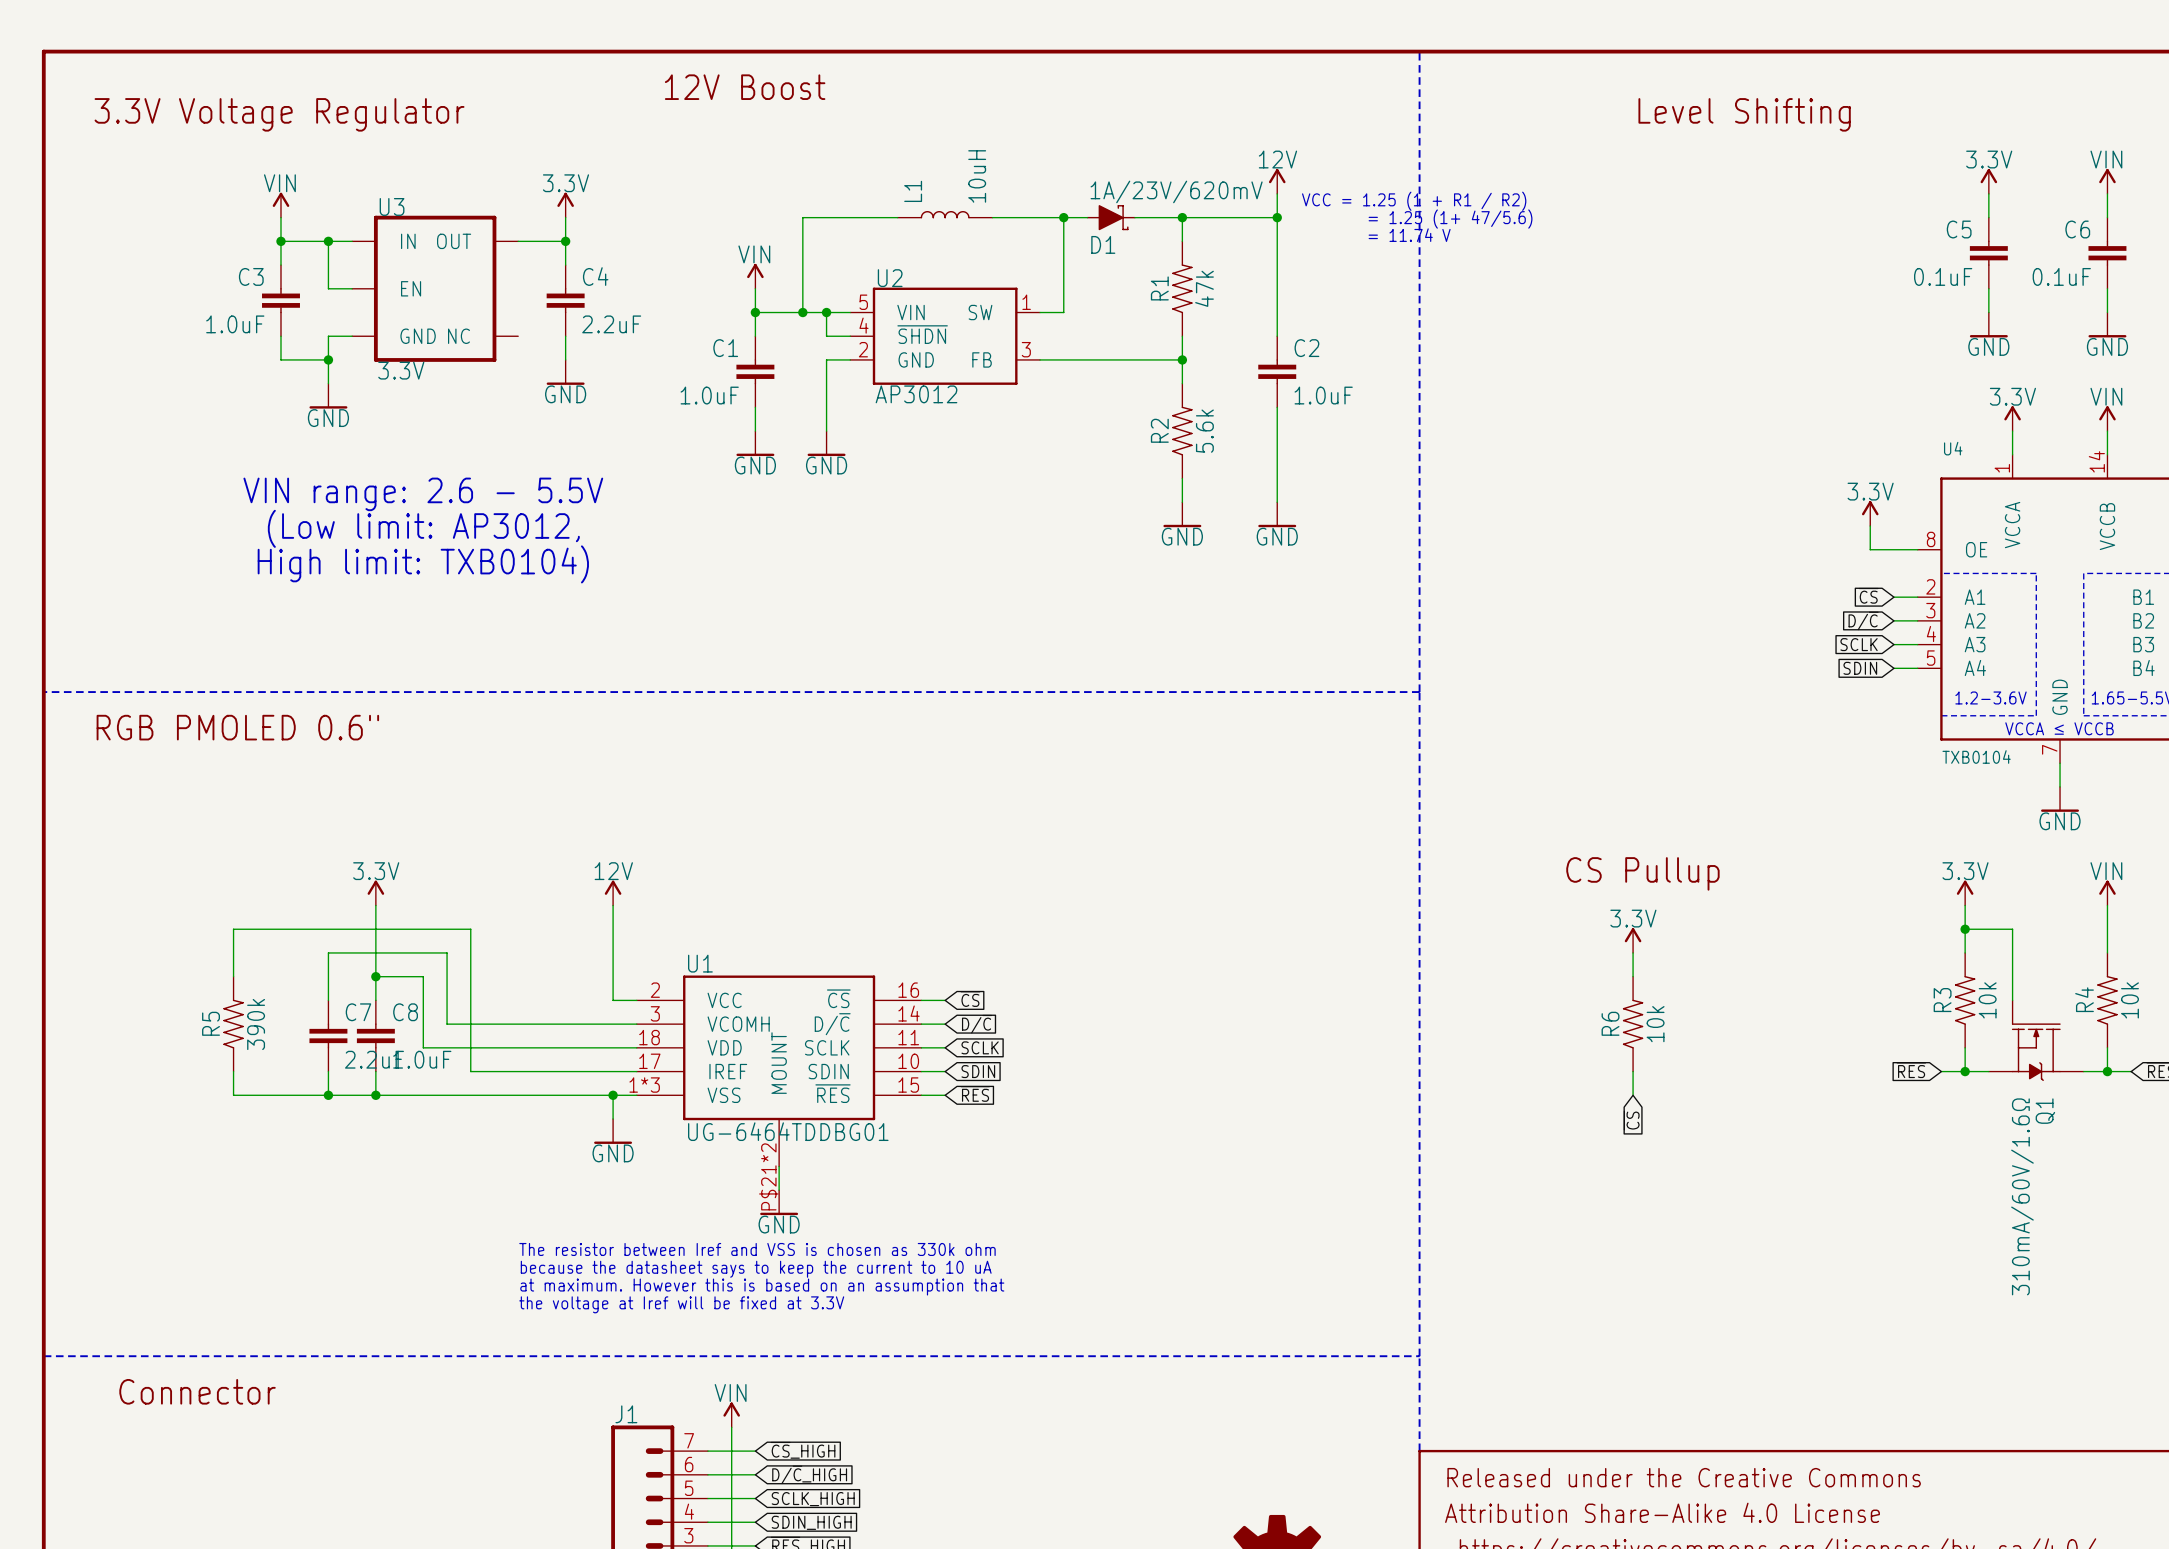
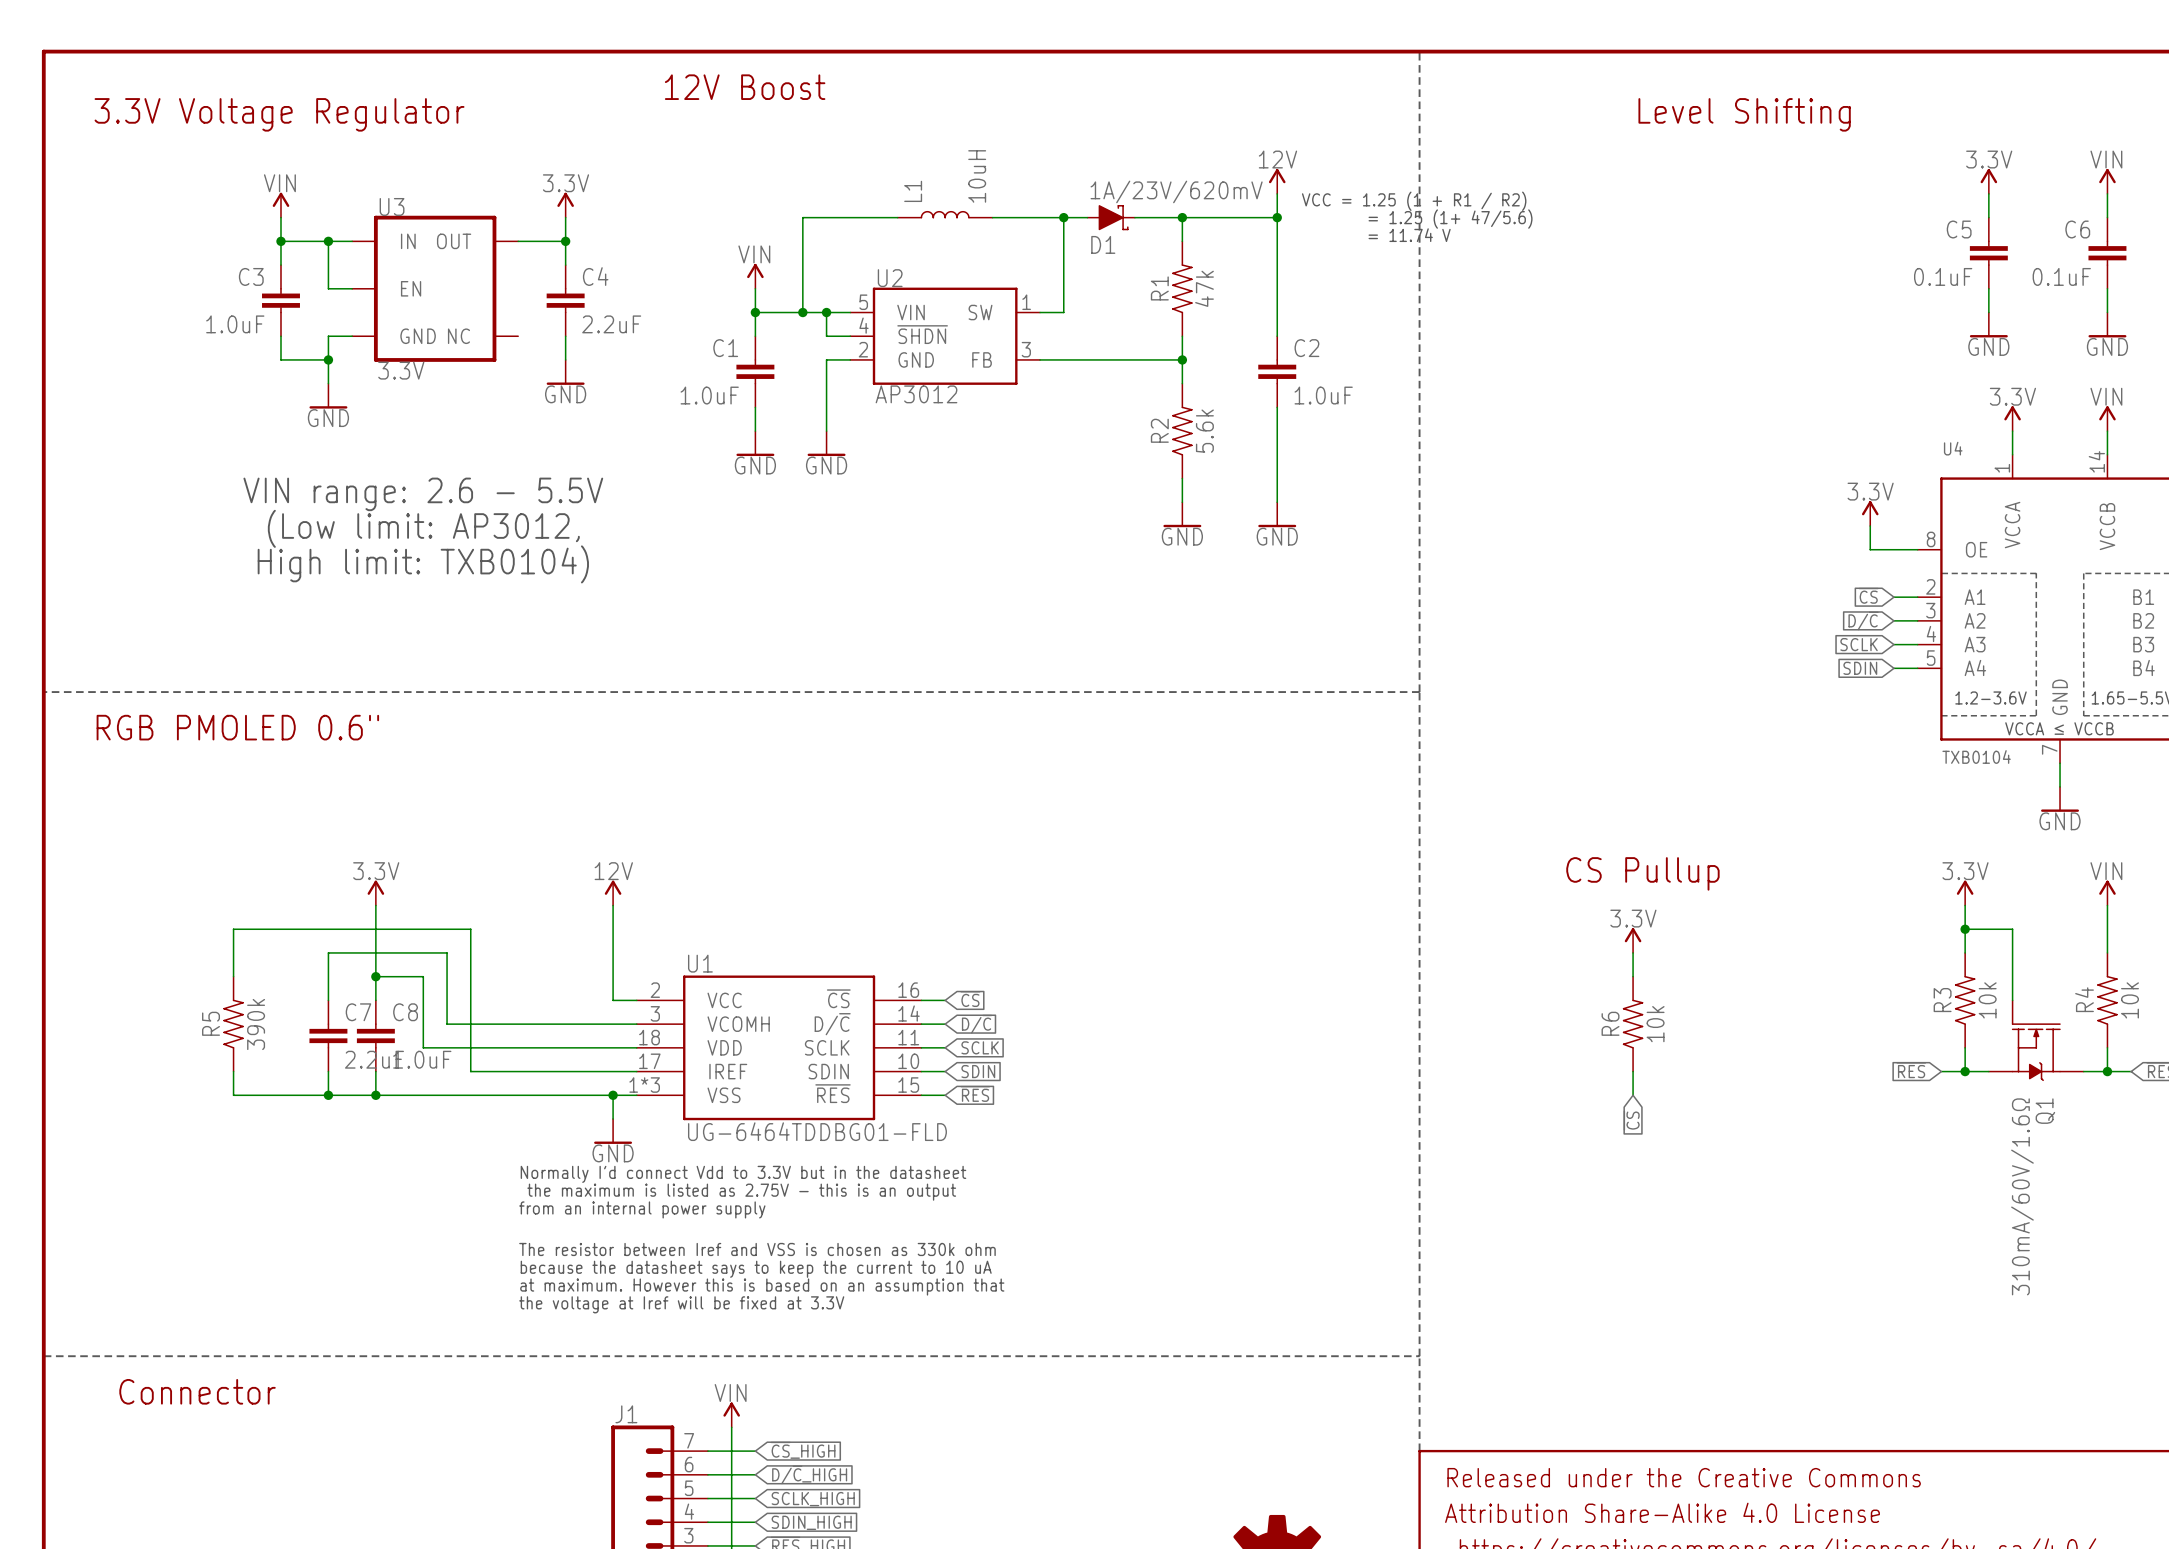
U1 symbol: [636, 975, 922, 1167] -> [636, 975, 922, 1121]
U1 value: UG-6464TDDBG01 (788, 1131) -> UG-6464TDDBG01-FLD (817, 1131)
wire: (779, 1166) (779, 1190) -> none
text: none -> Normally I'd connect Vdd to 3.3V but in the datasheet (743, 1174)
text: none -> the maximum is listed as 2.75V - this is an output (741, 1192)
power symbol: GND (779, 1202) -> none
text: none -> from an internal power supply (642, 1209)

